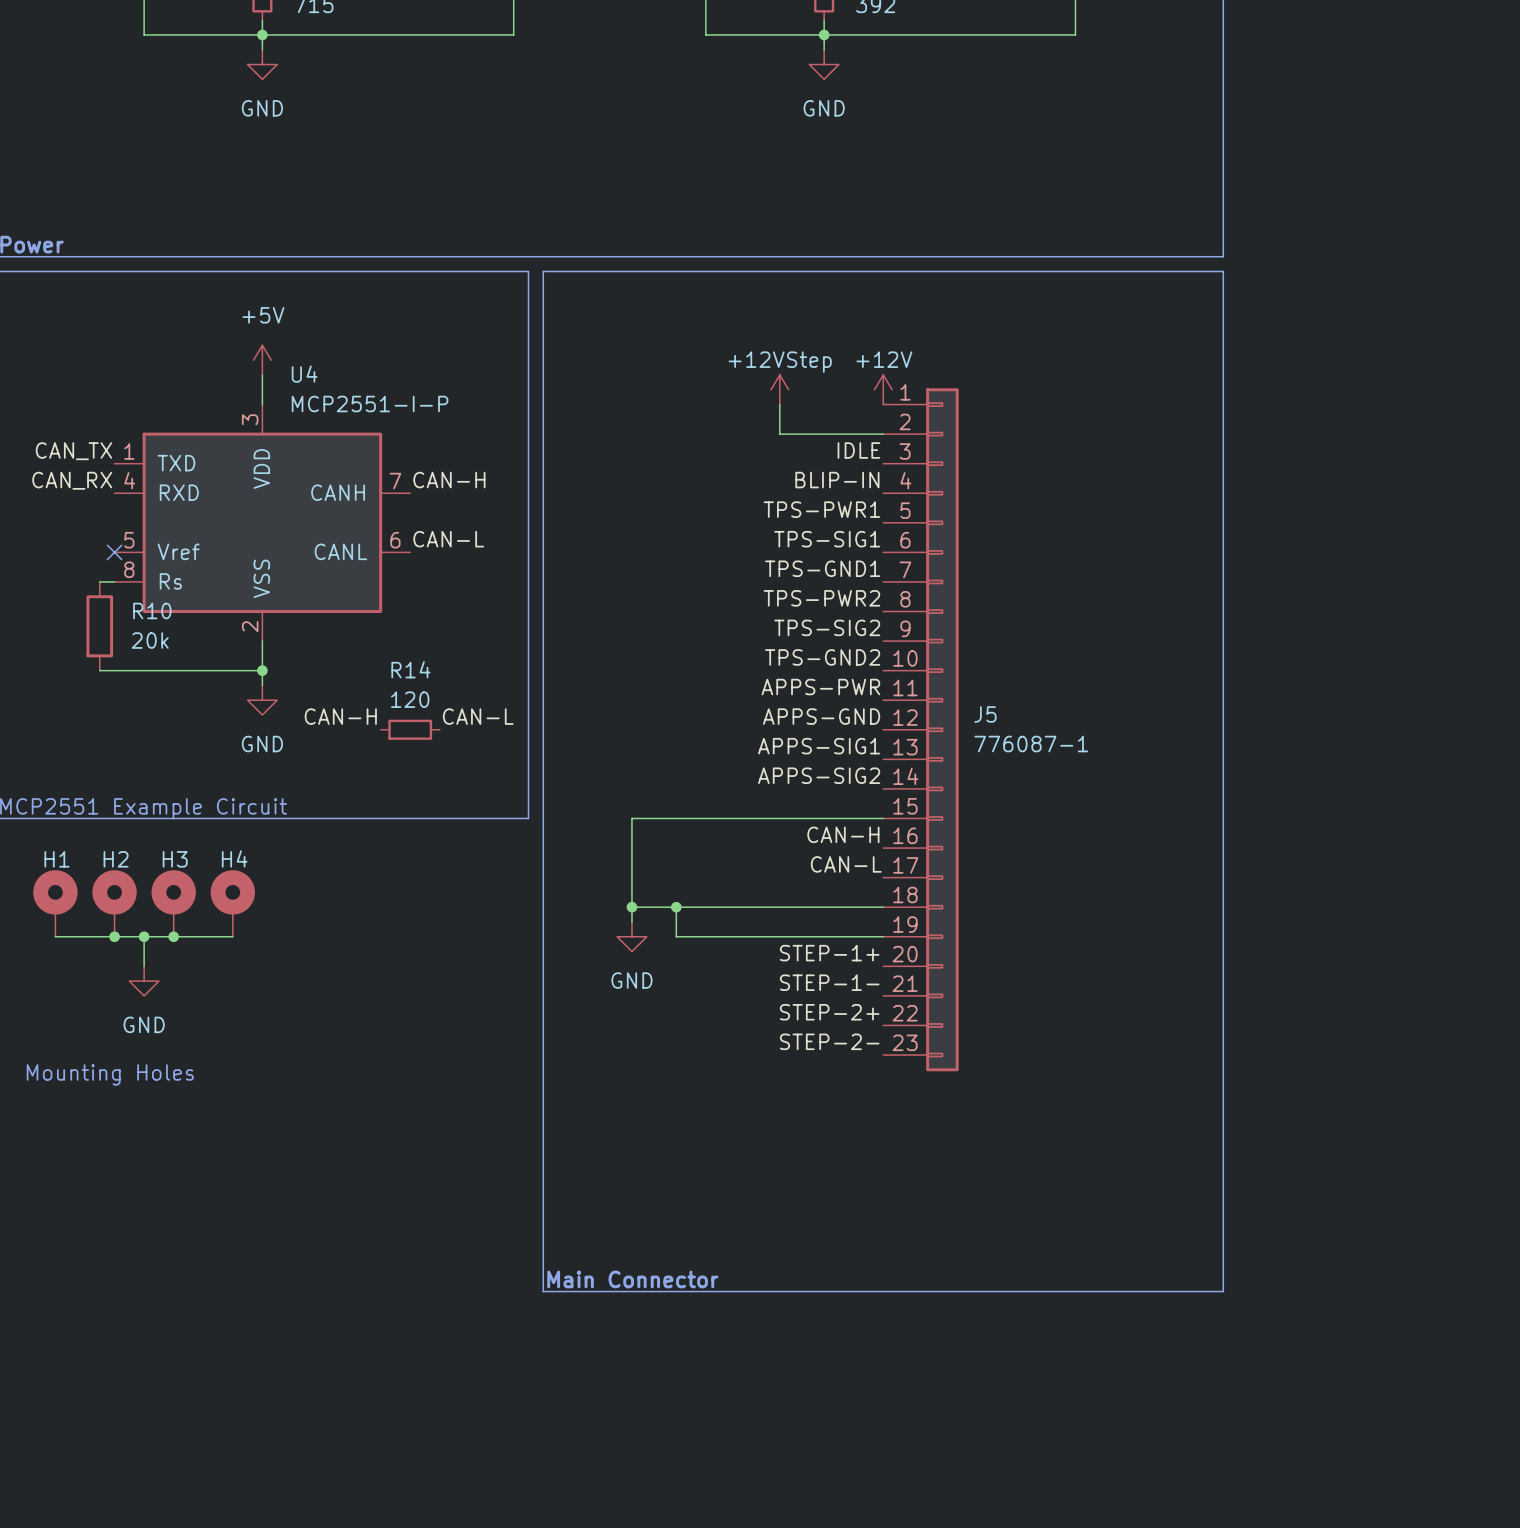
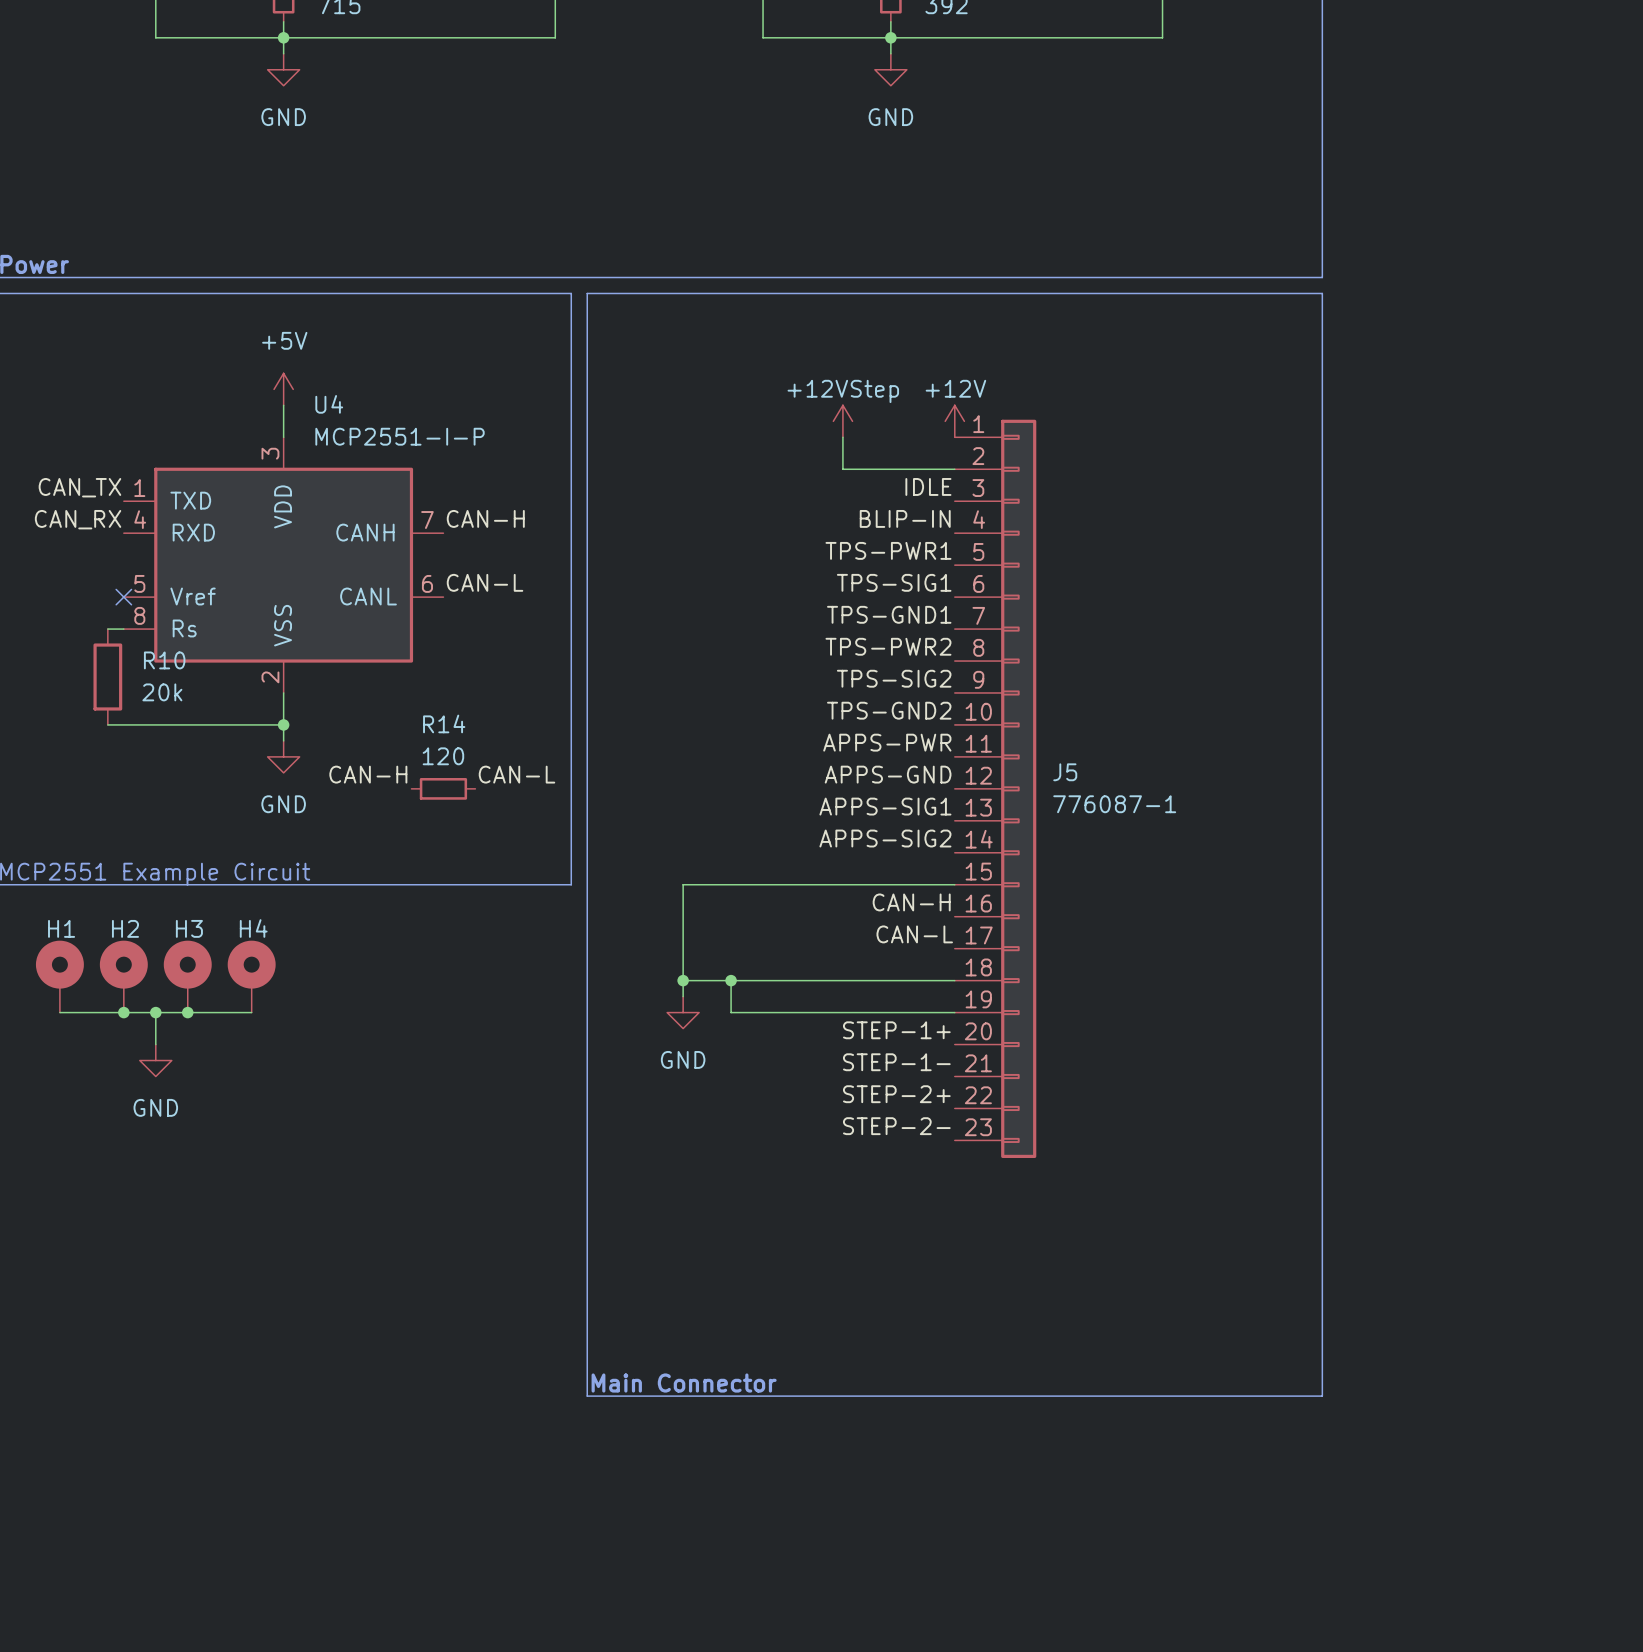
text: Mounting Holes (110, 1074) -> none

